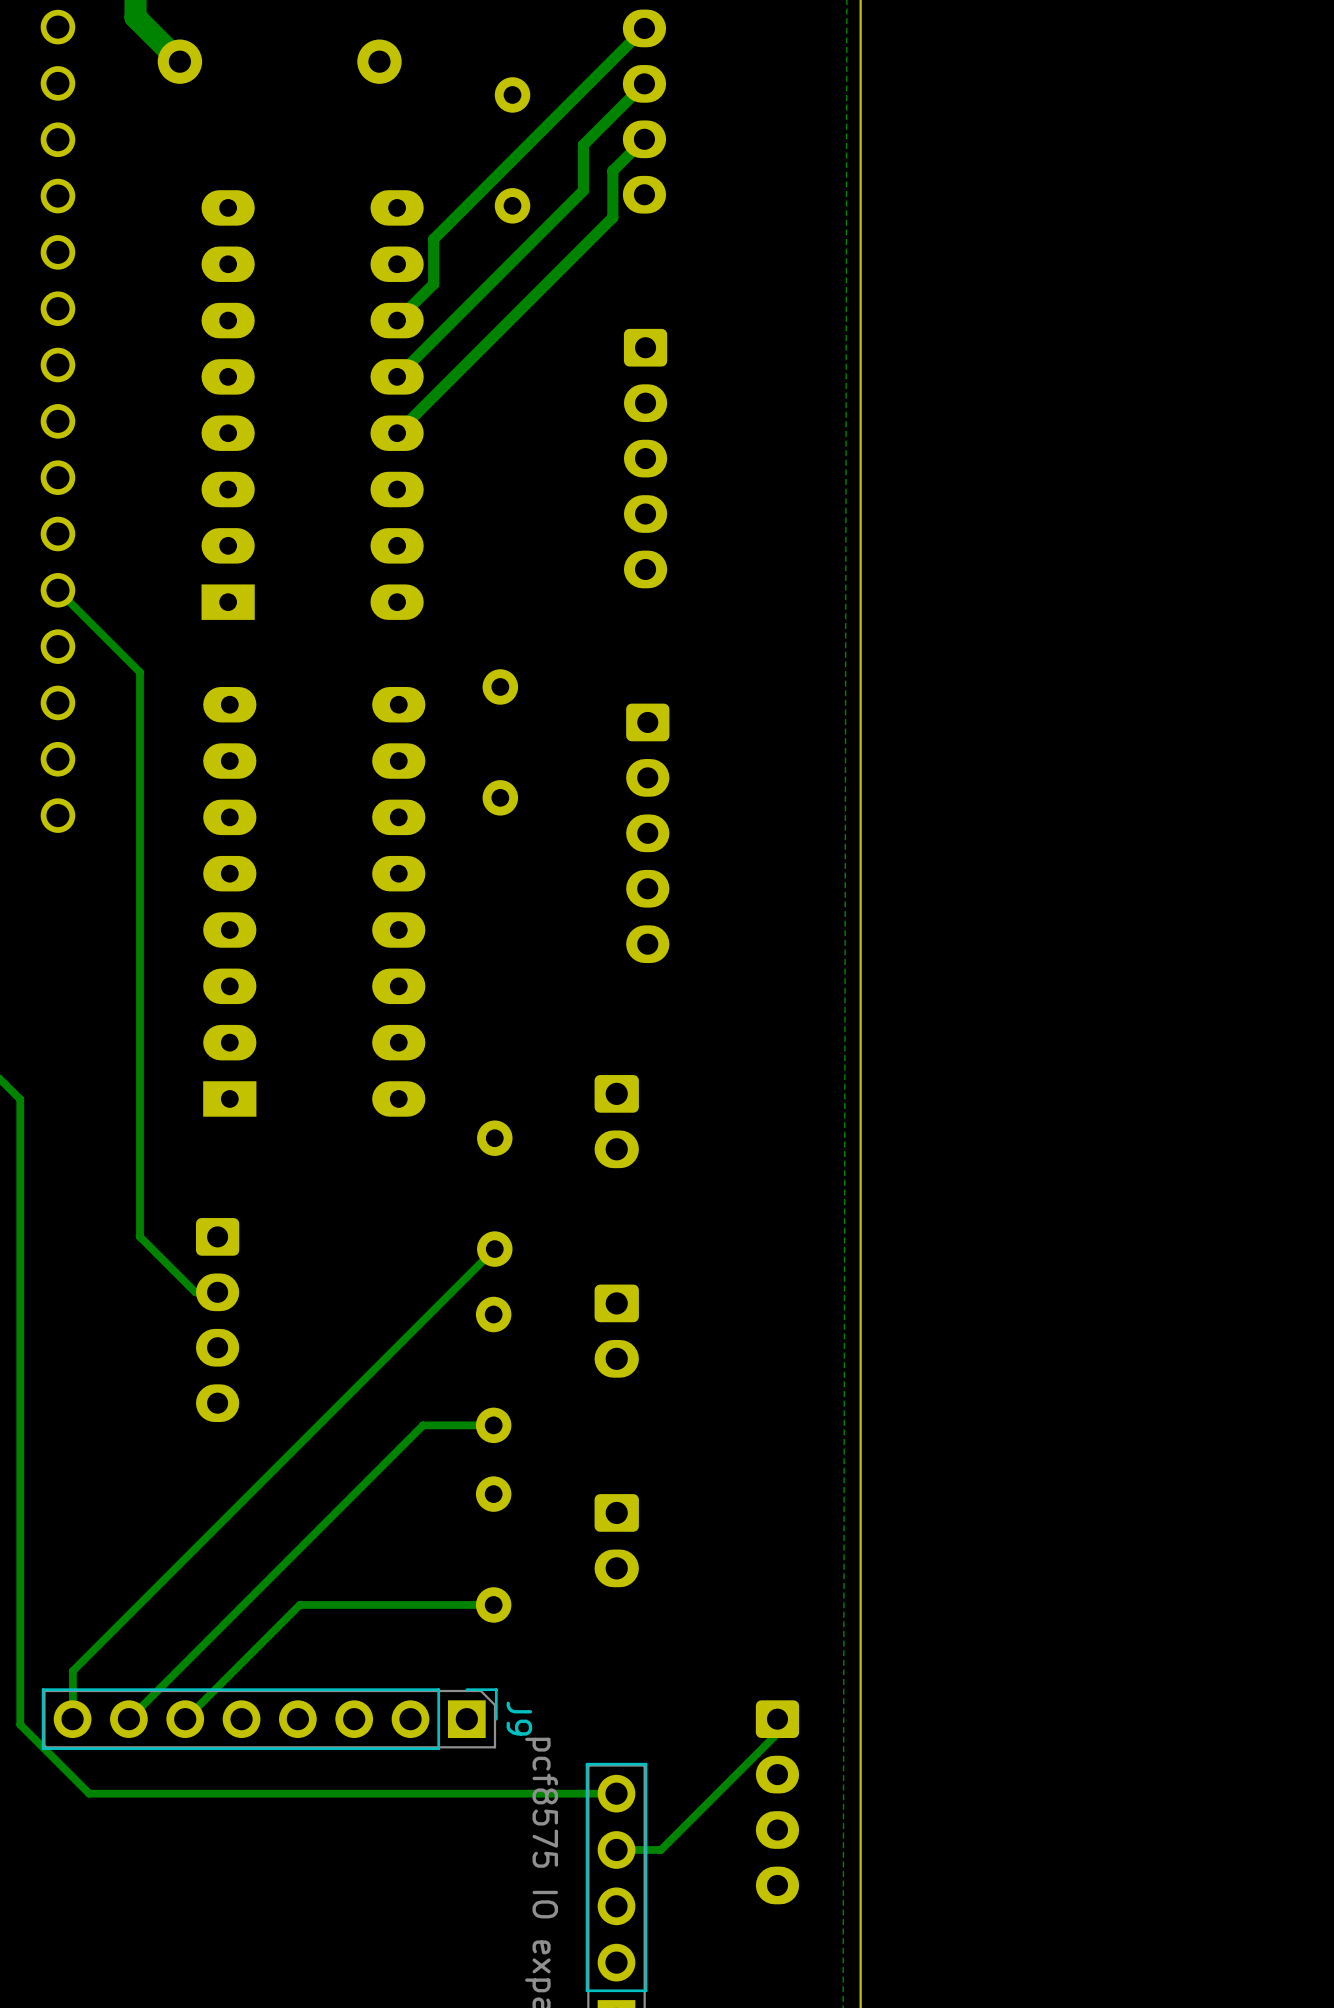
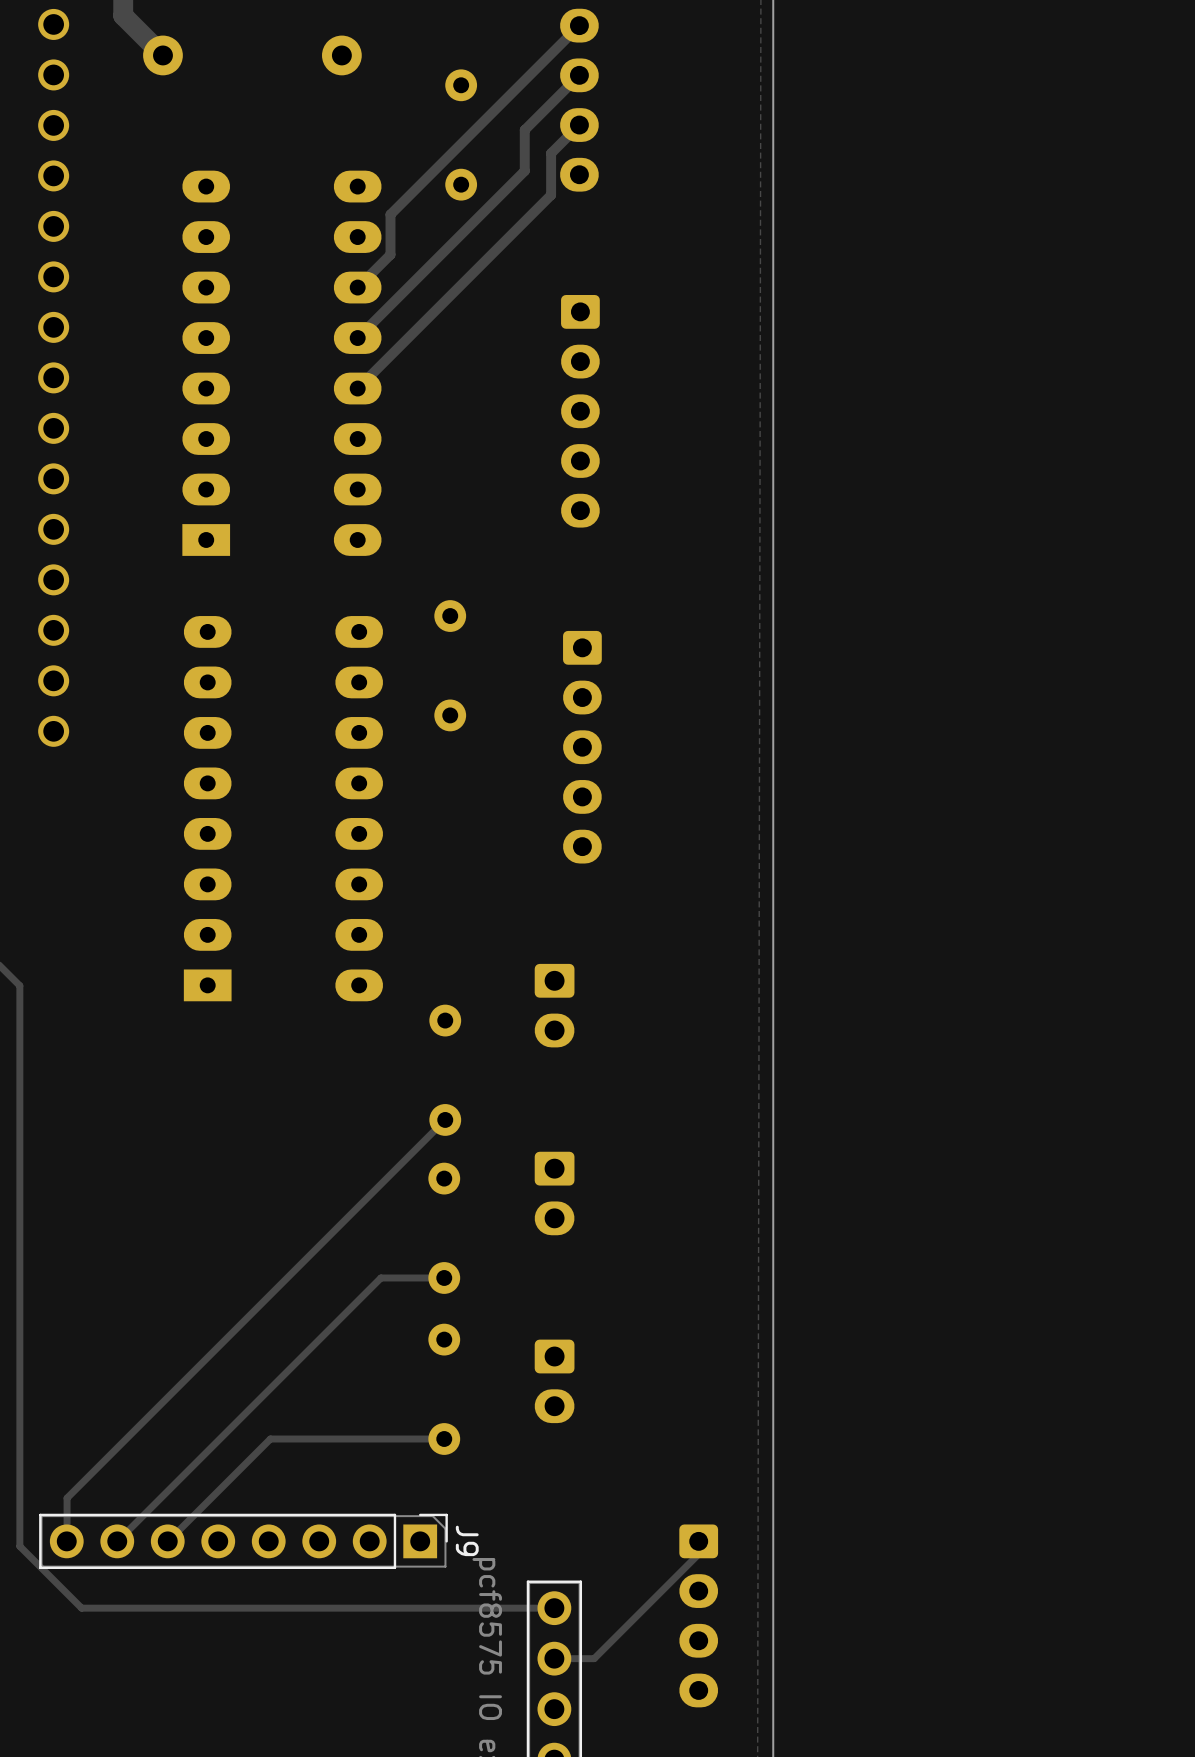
track: (57, 590) (140, 672) (140, 1236) (195, 1292) (217, 1292) -> none
part: (217, 1320) -> none

